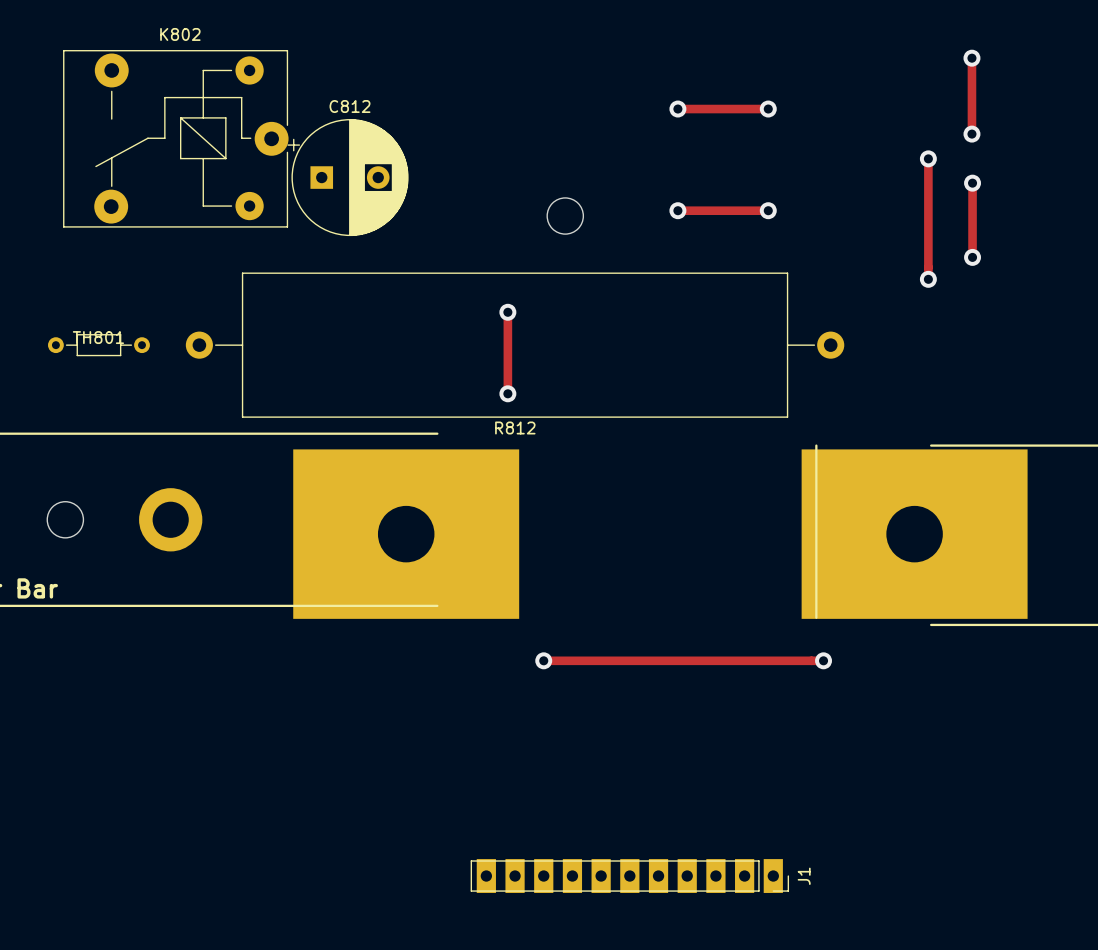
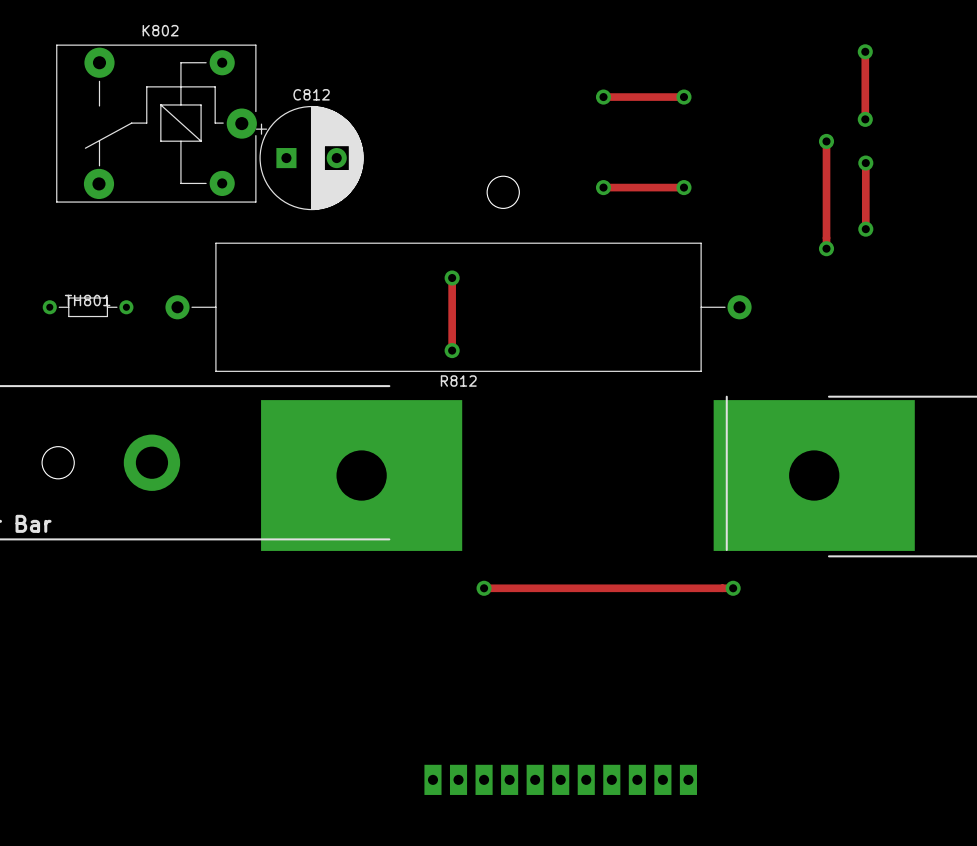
J1 side: top (629, 876) -> bottom (560, 779)

